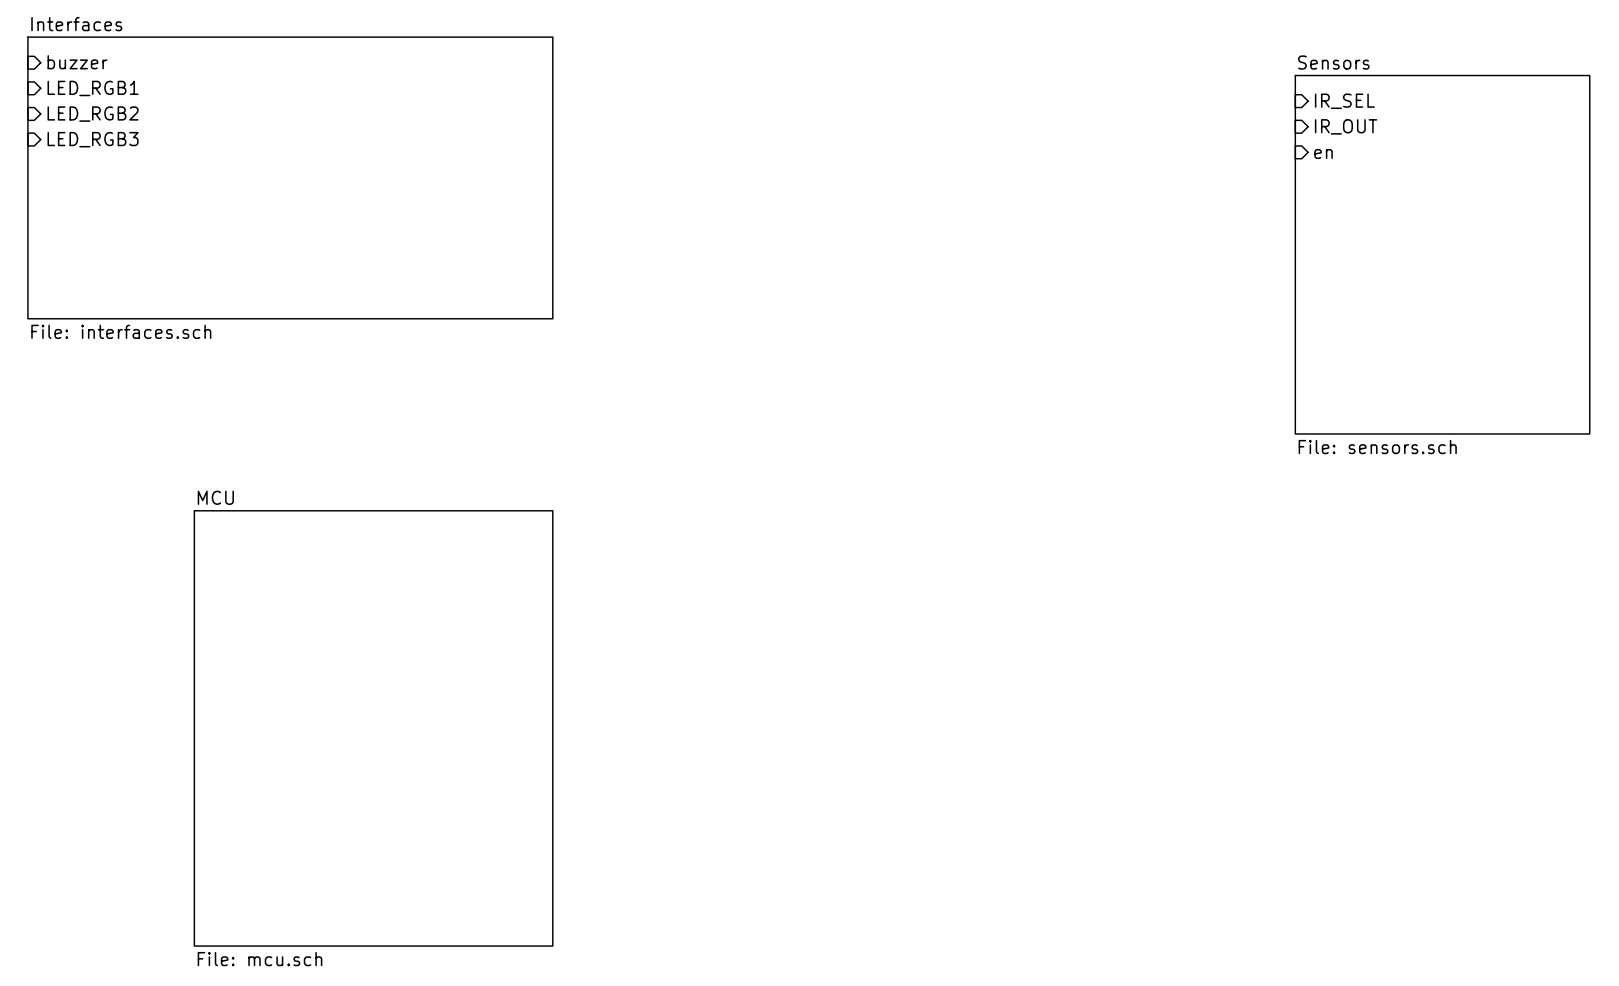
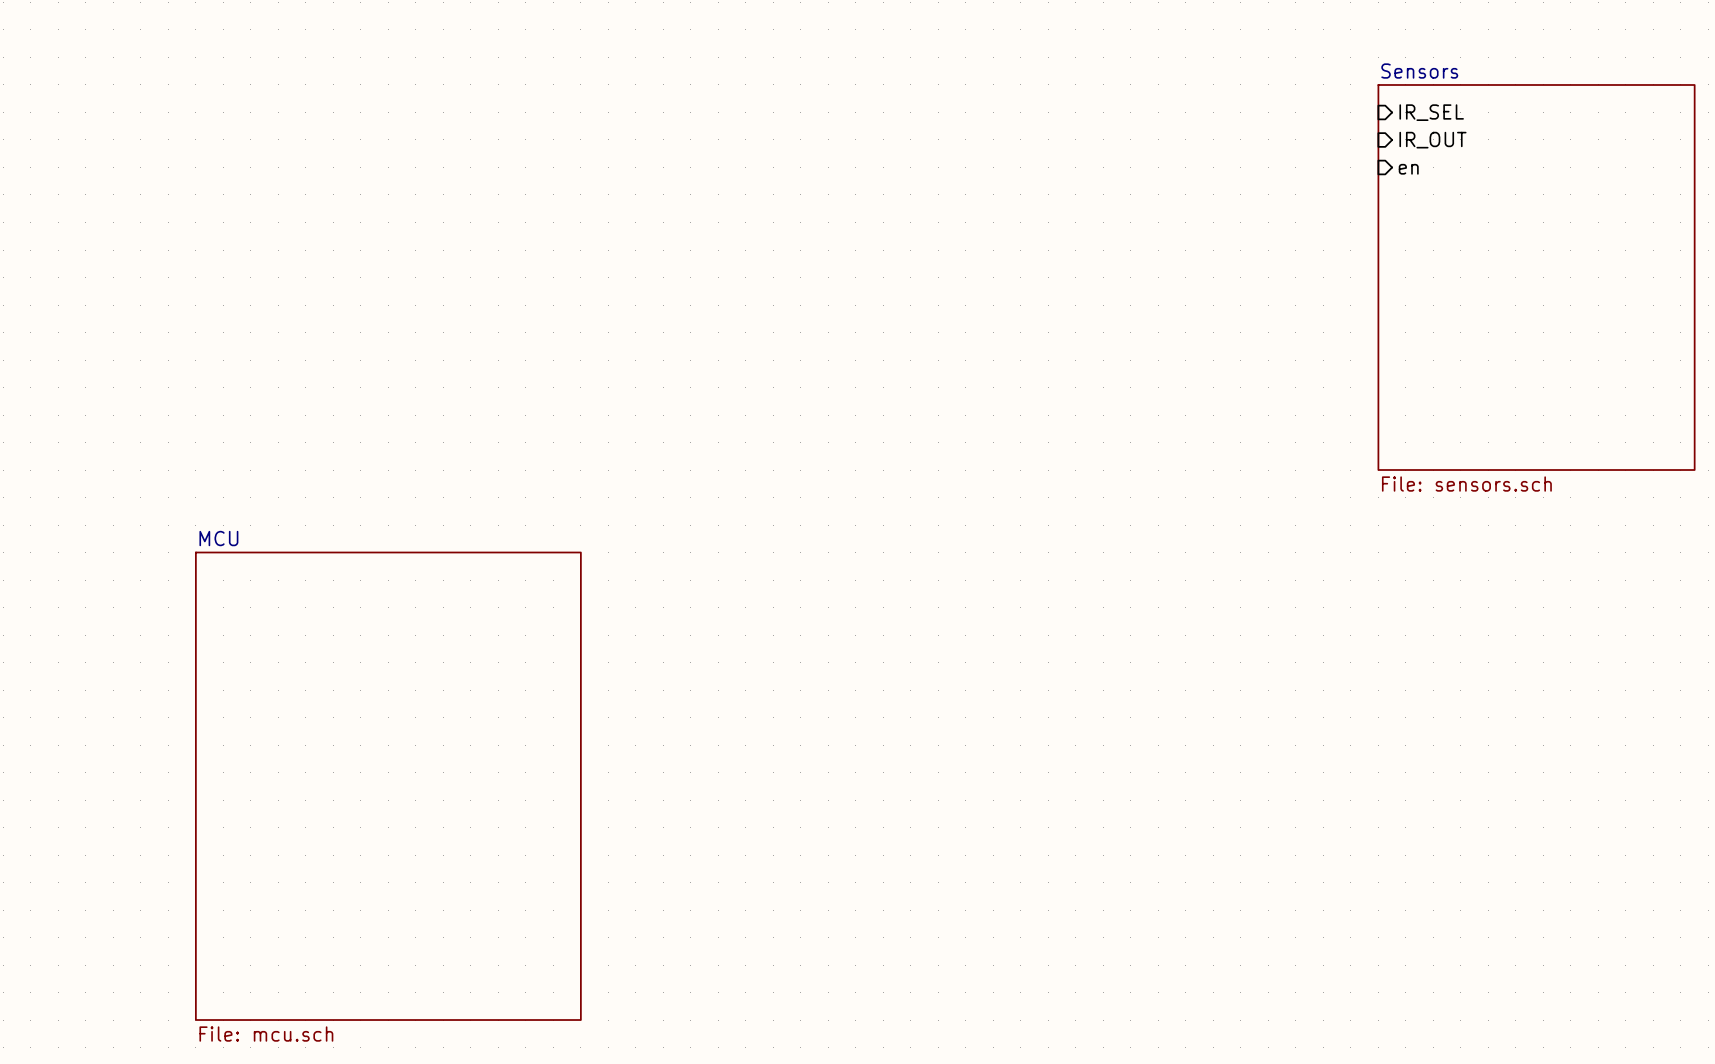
sheet pin: buzzer (77, 62) -> none
sheet pin: LED_RGB1 (93, 88) -> none
sheet pin: LED_RGB2 (93, 114) -> none
sheet pin: LED_RGB3 (93, 139) -> none
sheet Interfaces: File: interfaces.sch (290, 177) -> none

